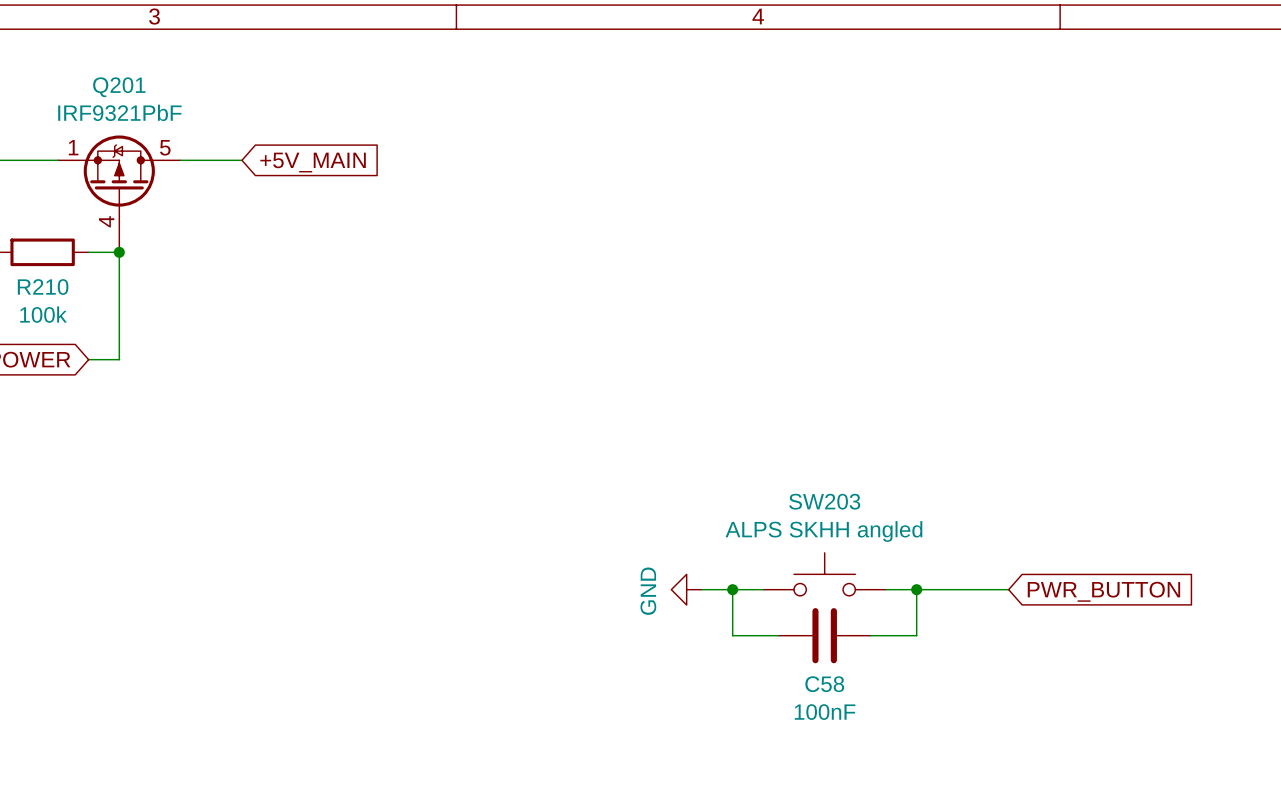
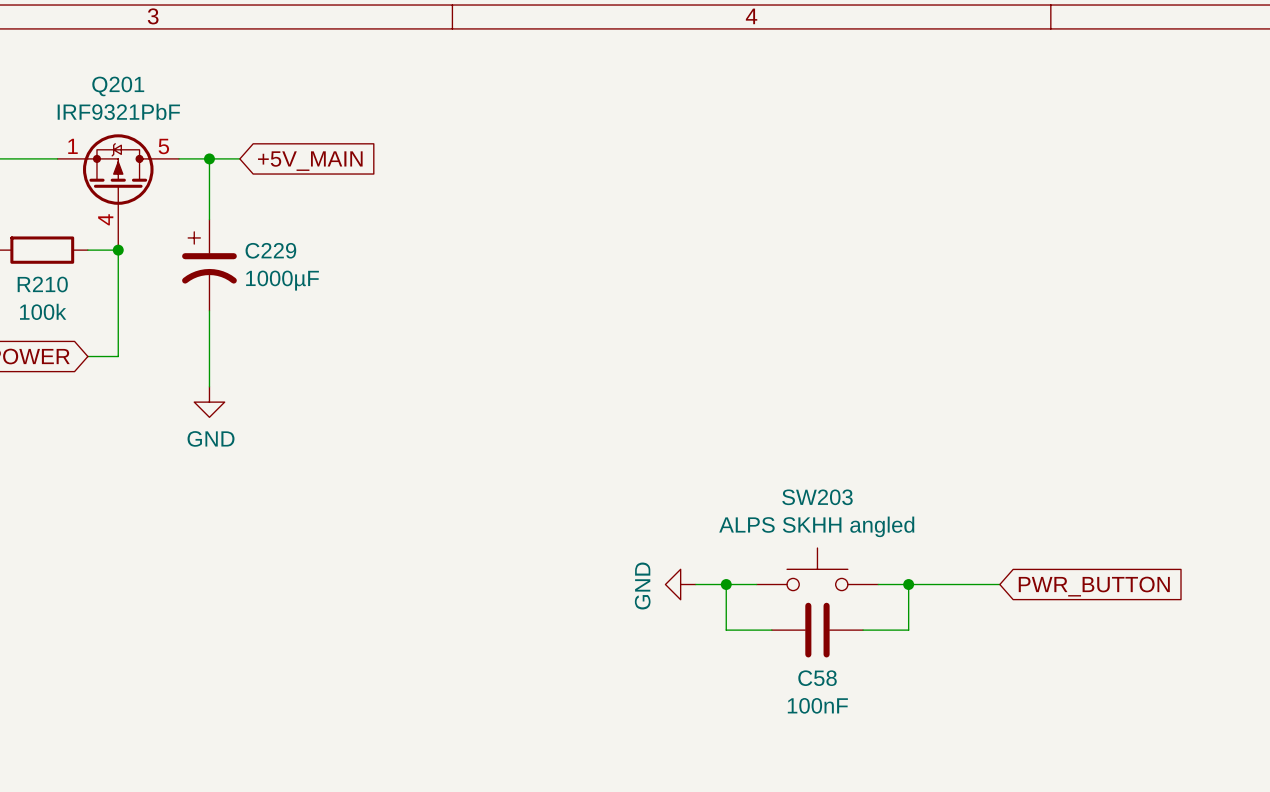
wire: none -> (209, 158) (209, 219)
junction: none -> (209, 158)
C229: none -> 1000µF (209, 265)
wire: none -> (209, 310) (209, 386)
power symbol: none -> GND (209, 402)

